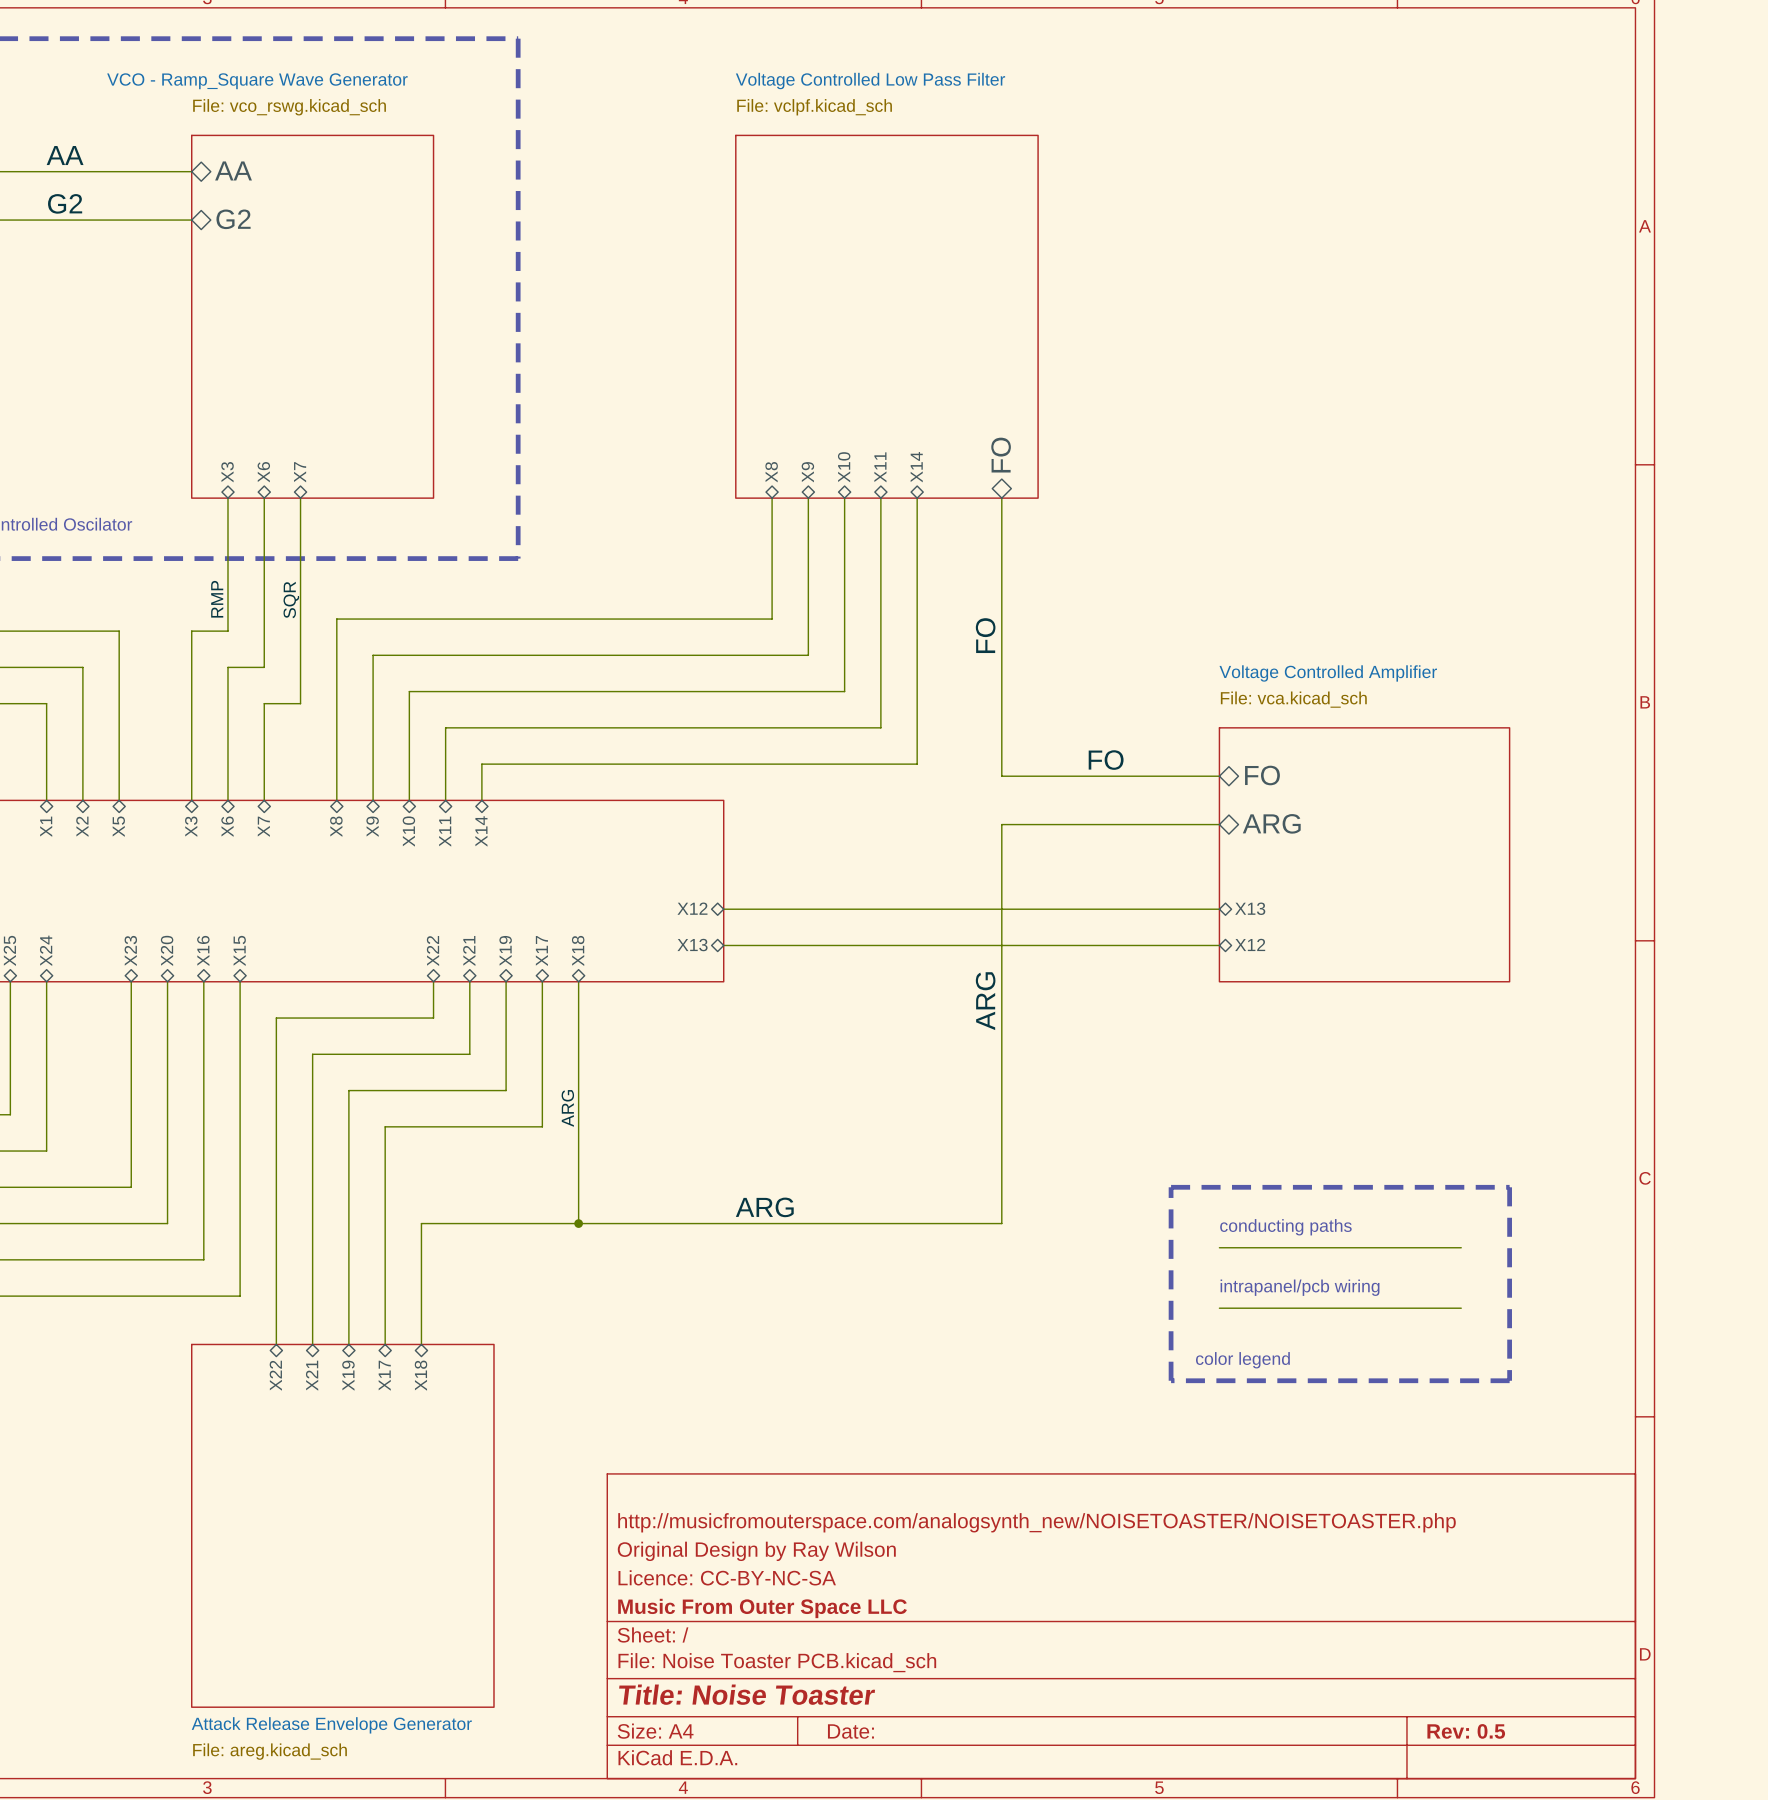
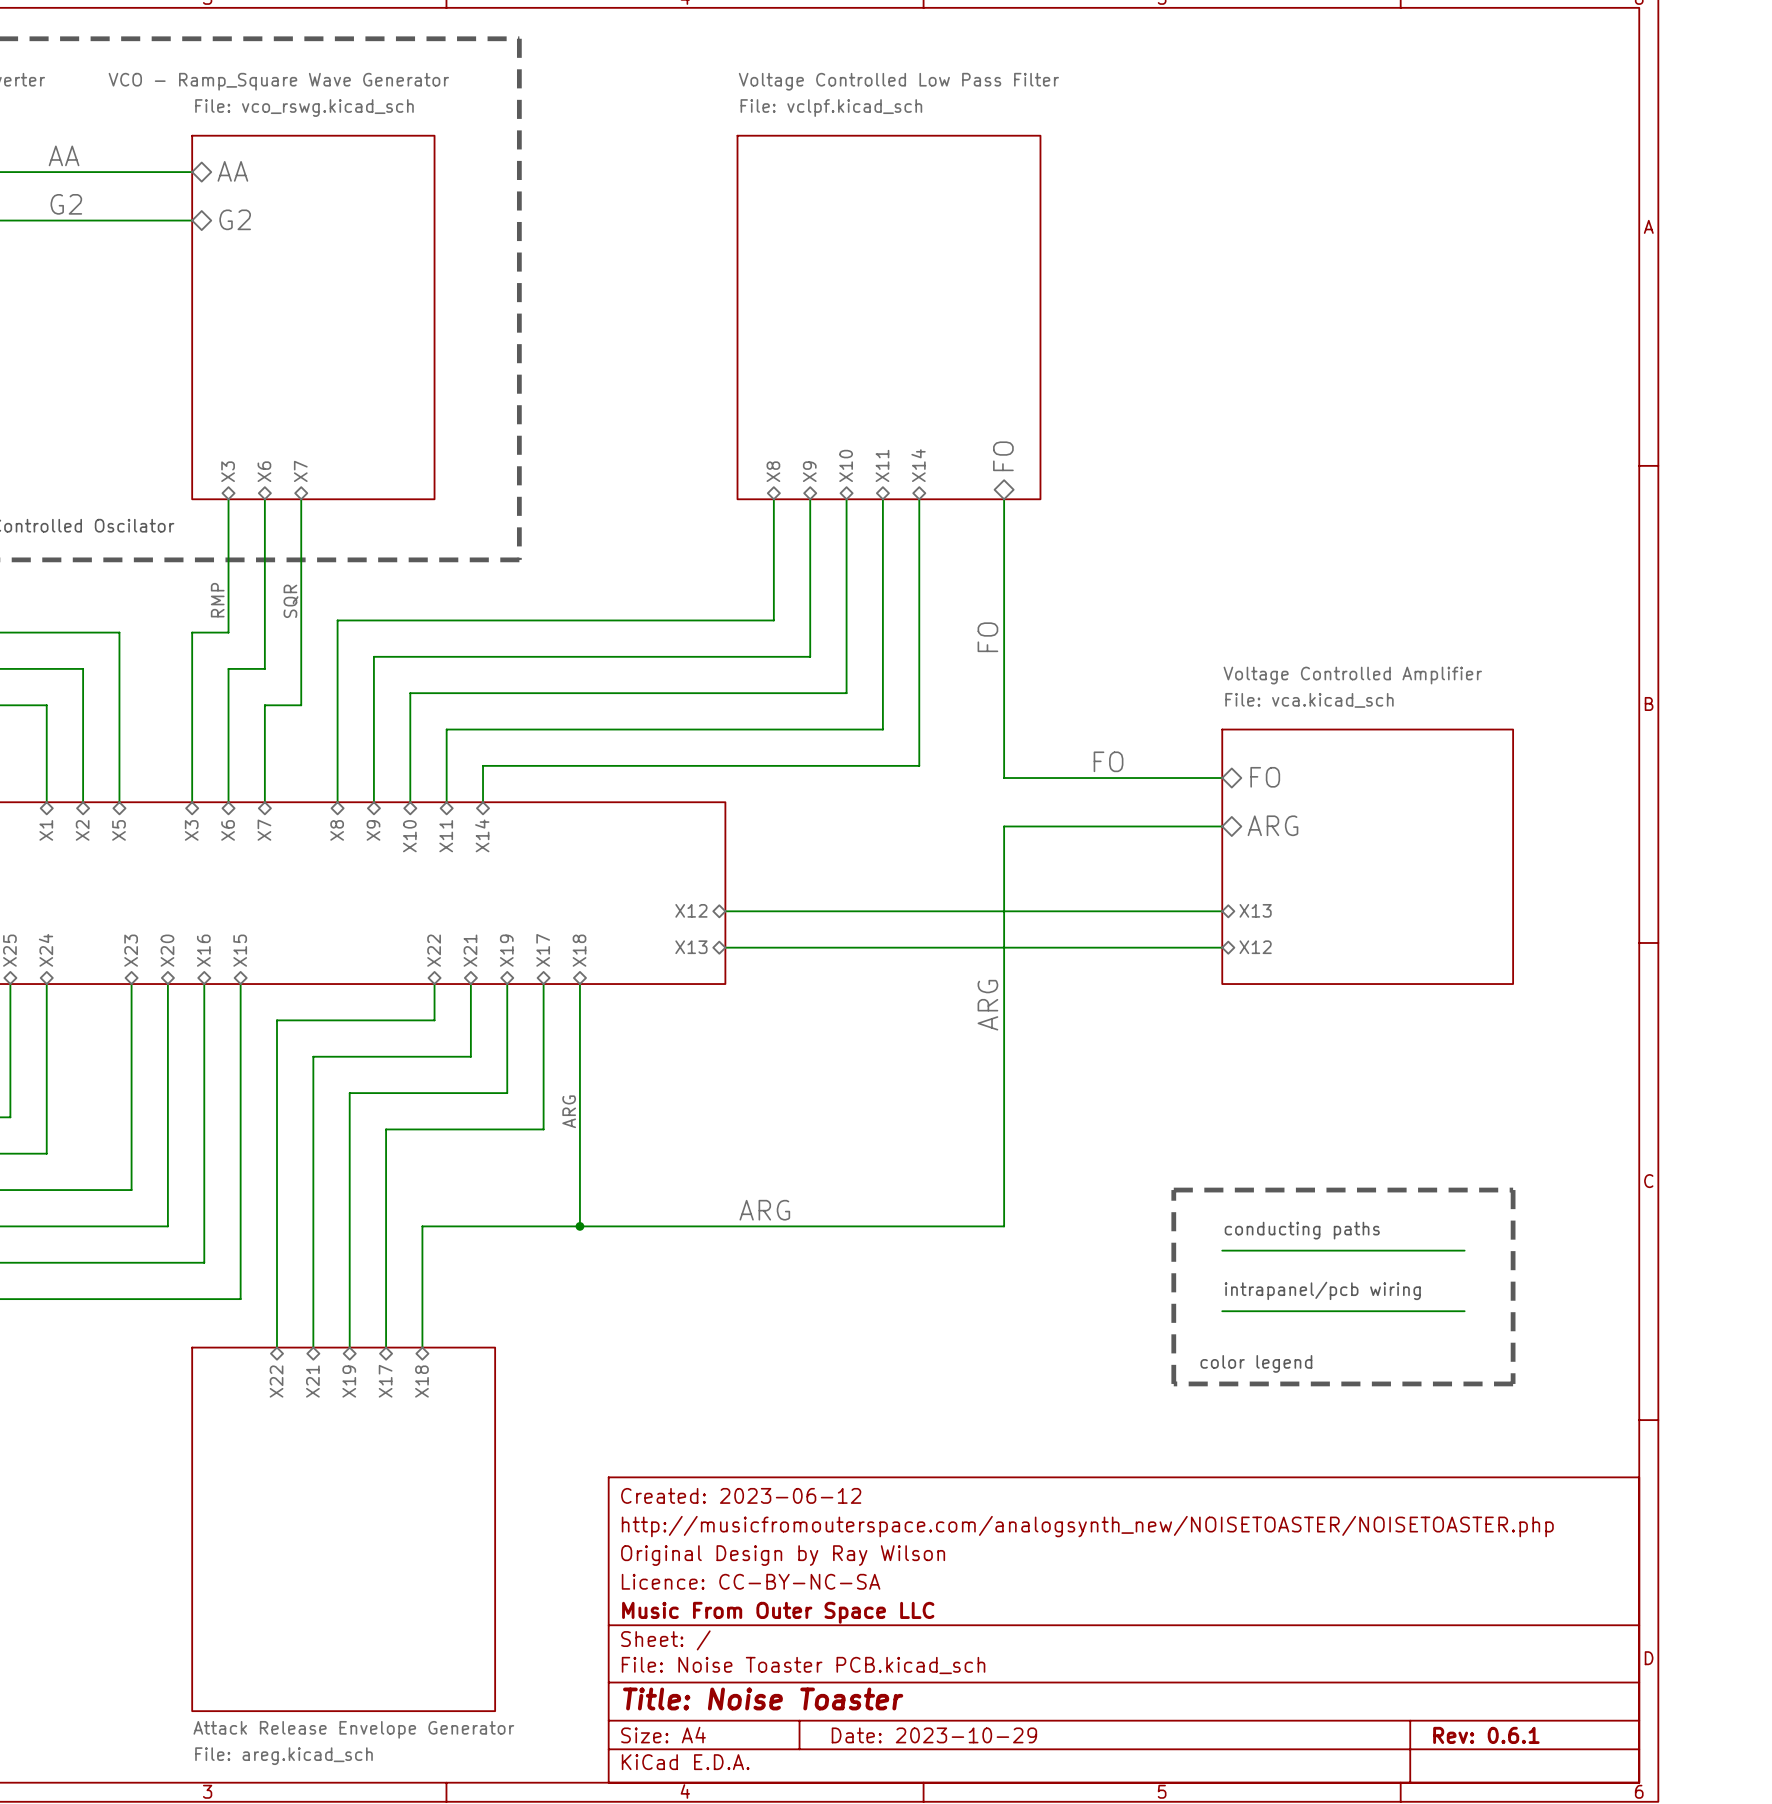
title block: none -> Created: 2023-06-12 (741, 1495)
title block: Date: (850, 1731) -> Date: 2023-10-29 (934, 1735)
title block: Rev: 0.5 (1466, 1731) -> Rev: 0.6.1 (1486, 1735)

